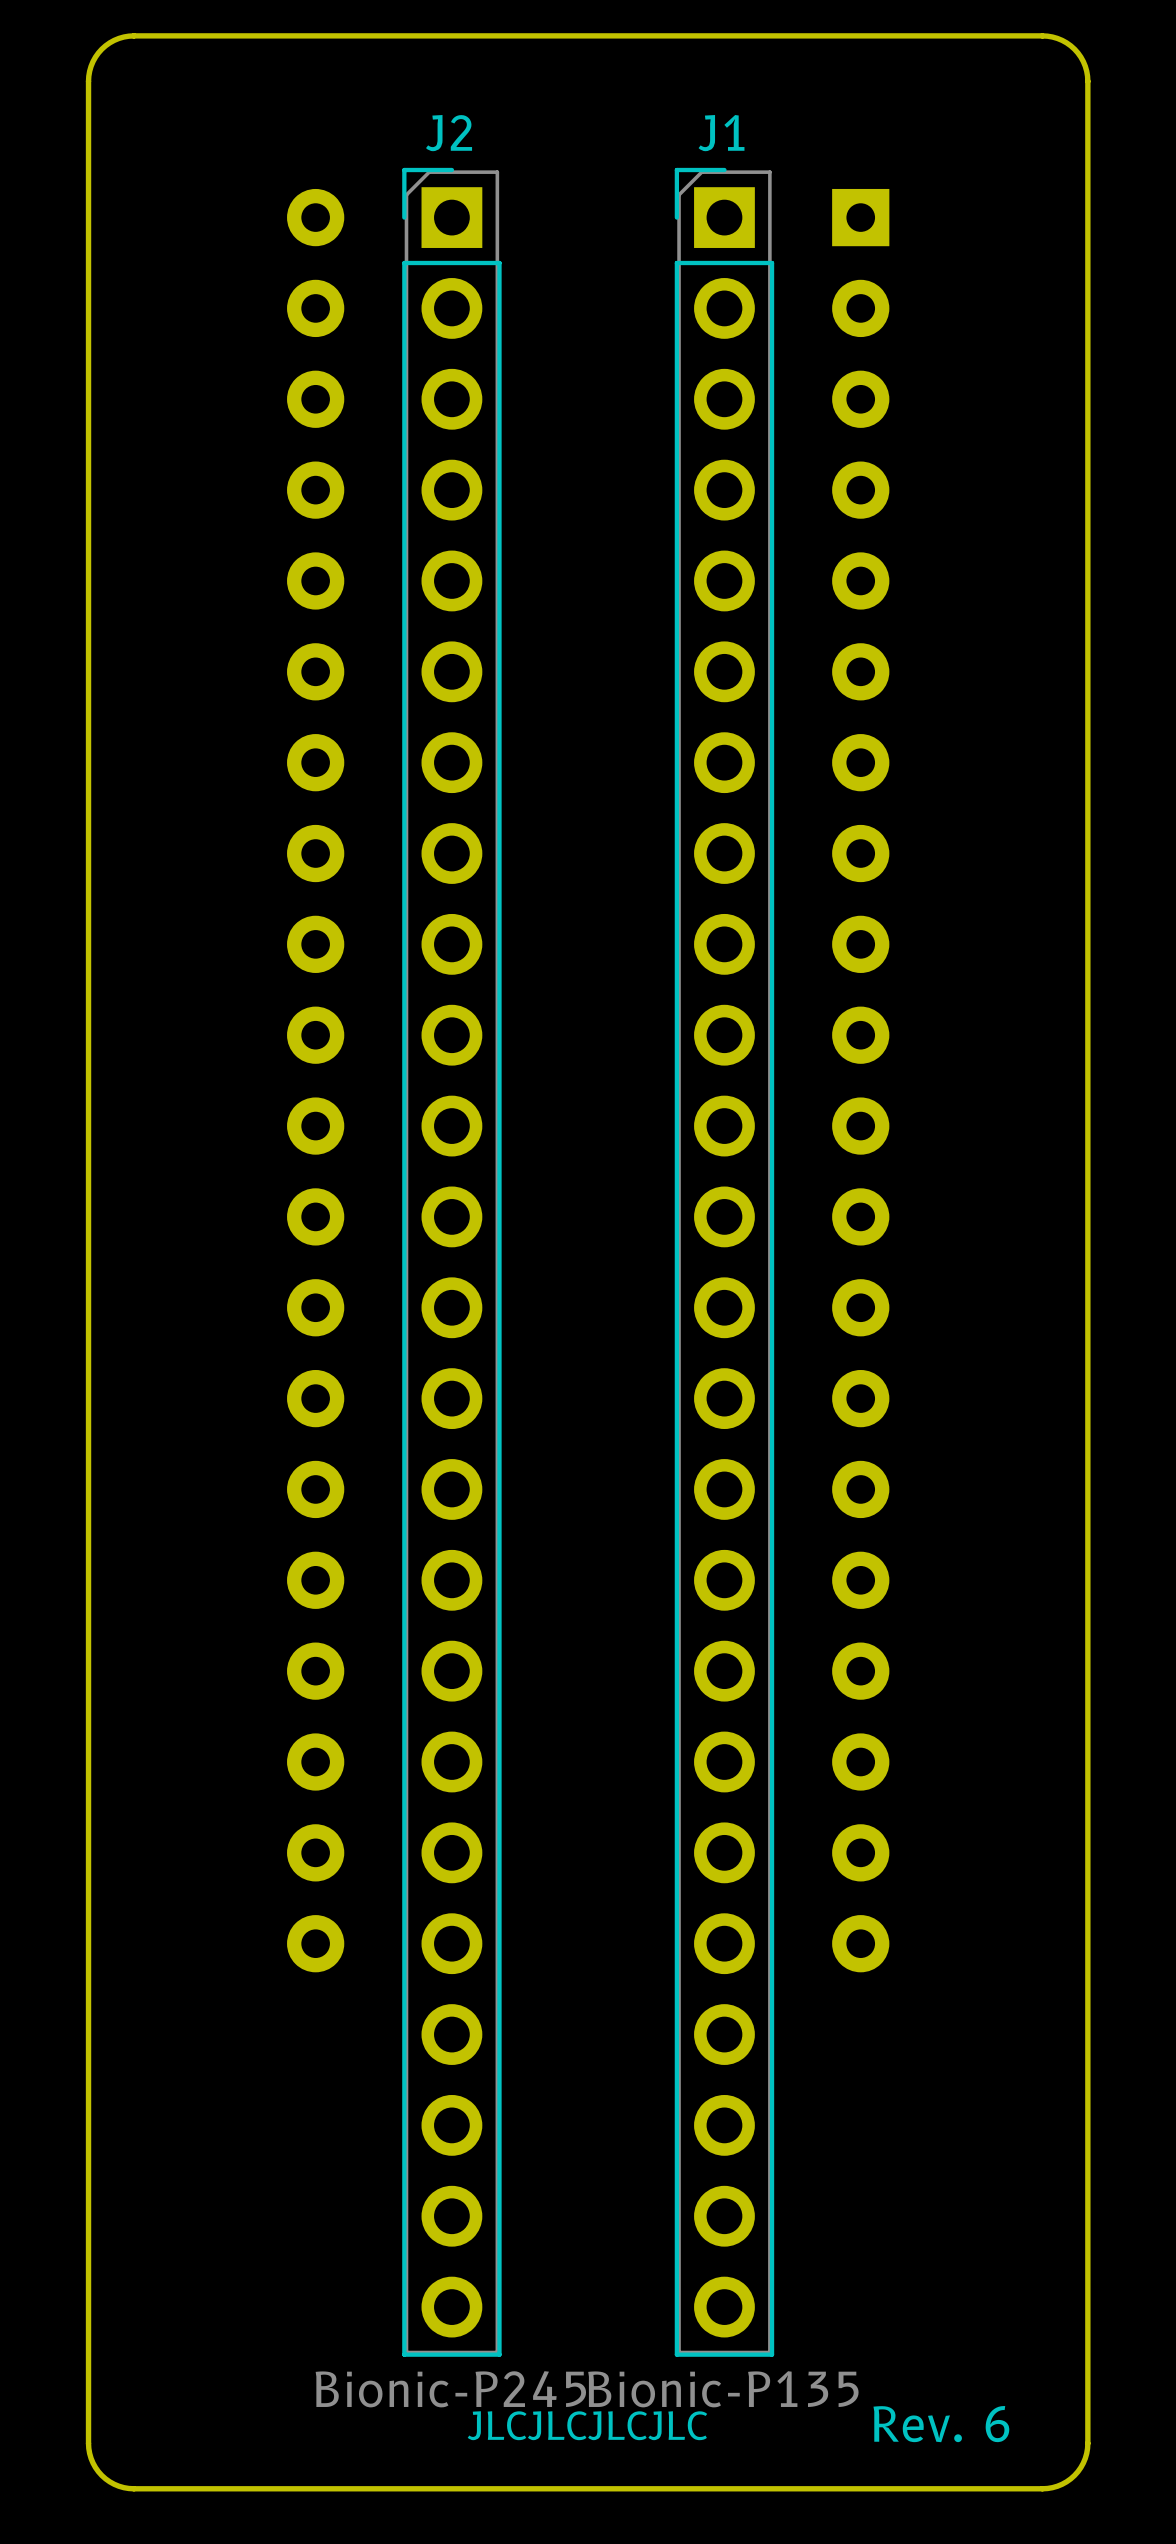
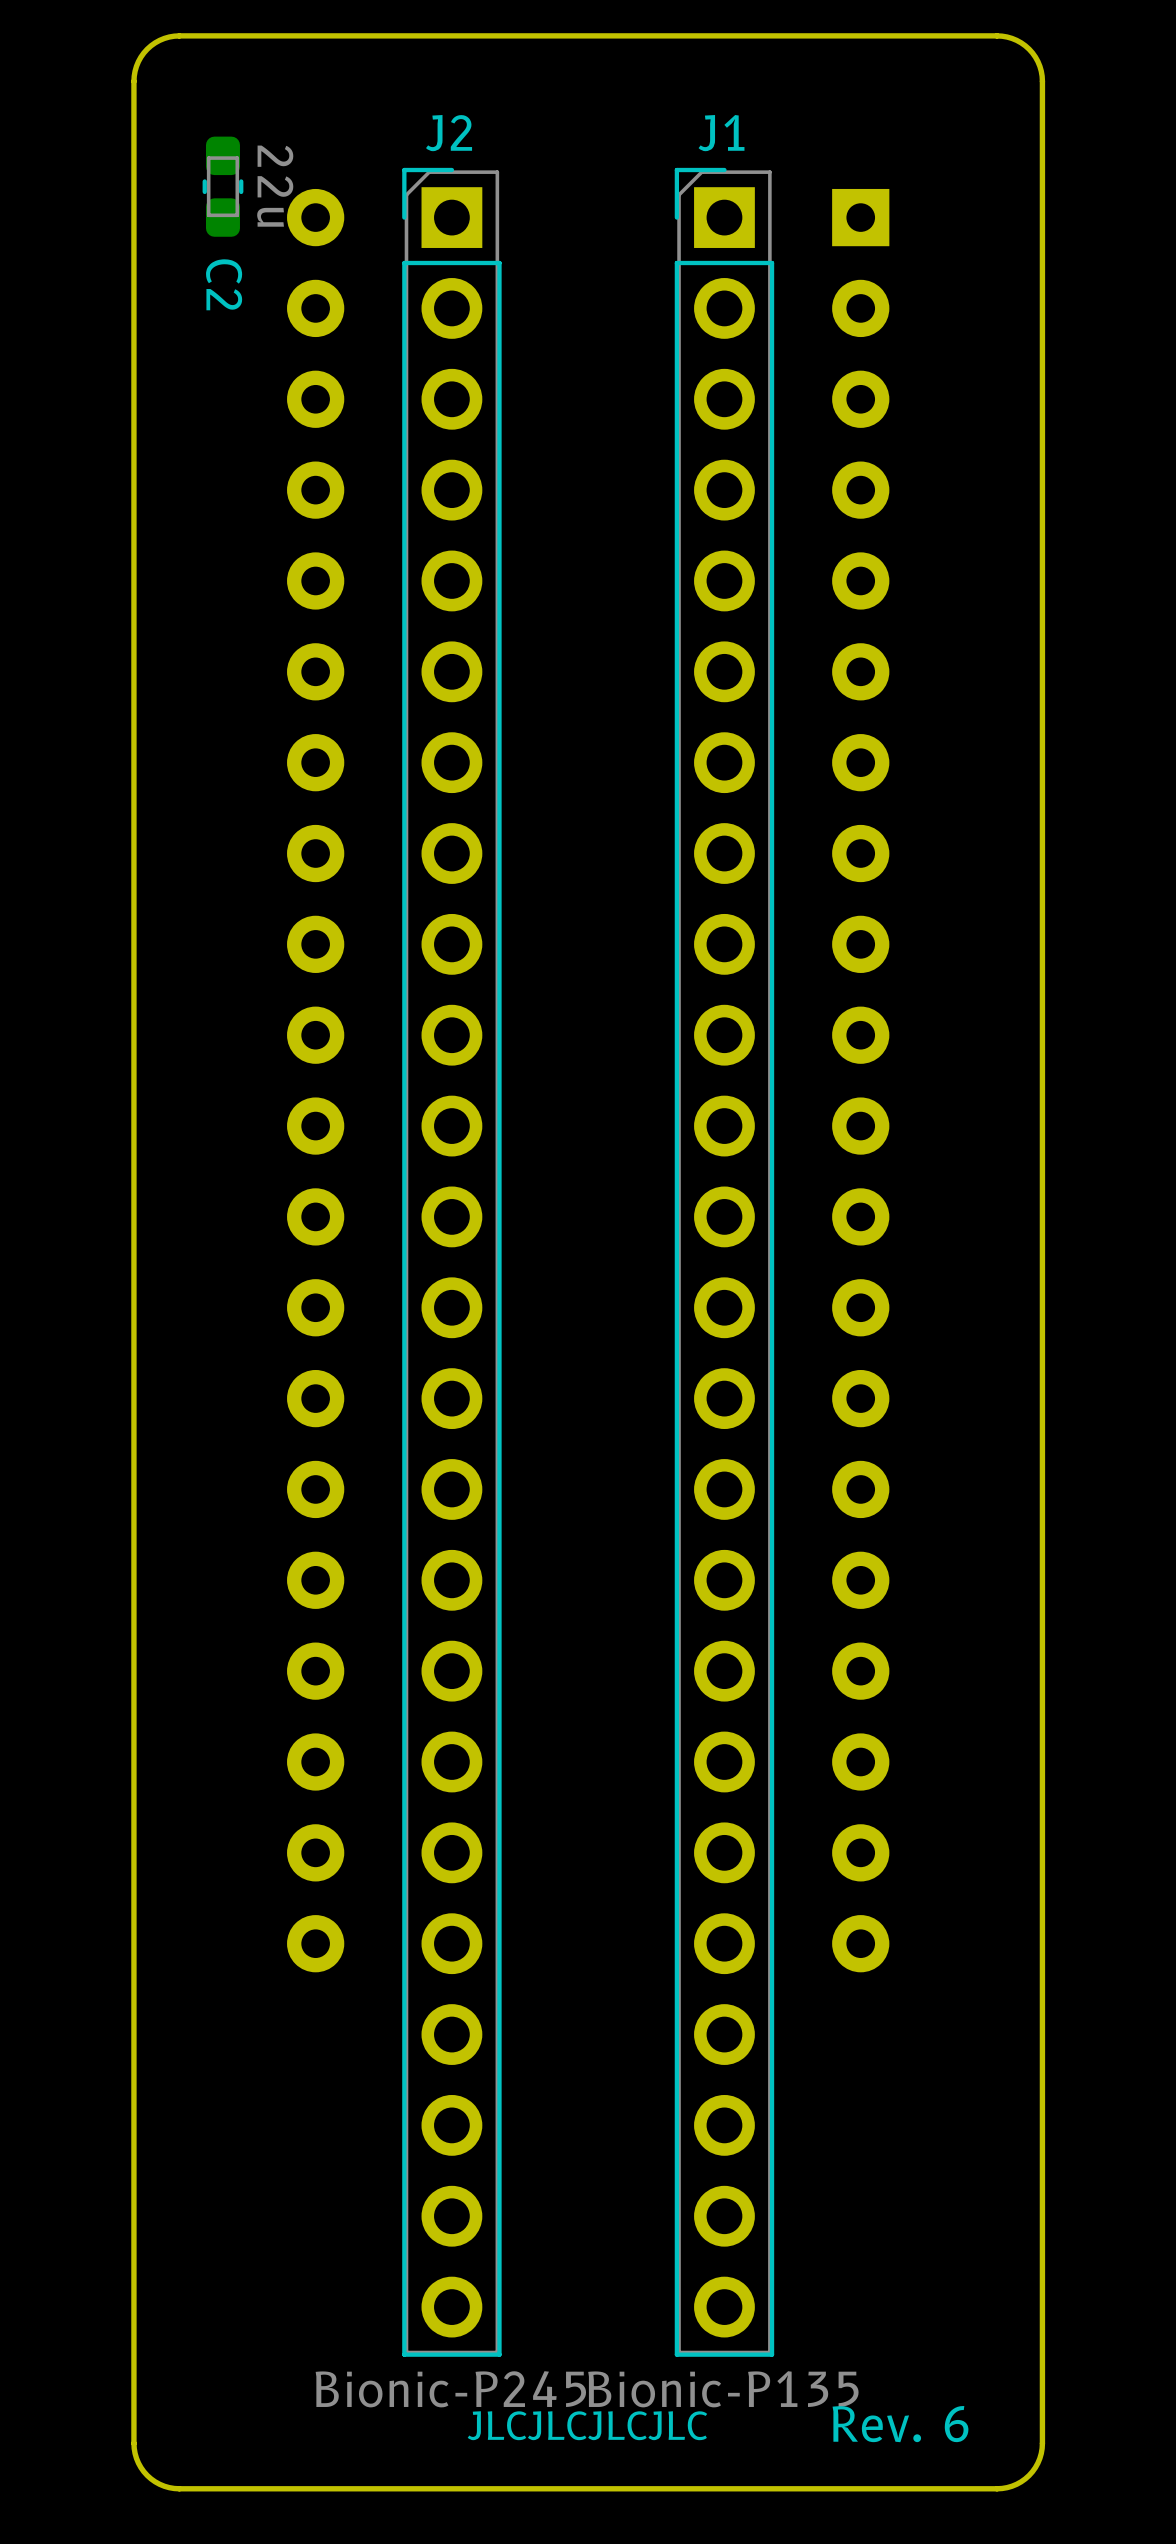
board edge: (179, 35) (128, 36) (114, 40) (105, 45) (95, 57) (89, 71) (88, 81) (88, 2443) (89, 2453) (95, 2467) (105, 2478) (114, 2484) (128, 2488) (179, 2488) -> (179, 35) (164, 38) (147, 49) (136, 66) (133, 81) (133, 2443) (136, 2458) (147, 2475) (164, 2486) (179, 2488)
board edge: (997, 35) (1047, 36) (1062, 40) (1070, 45) (1080, 57) (1086, 71) (1087, 81) (1087, 2443) (1086, 2453) (1080, 2467) (1074, 2475) (1062, 2484) (1047, 2488) (997, 2488) -> (997, 35) (1012, 38) (1029, 49) (1039, 66) (1042, 81) (1042, 2443) (1039, 2458) (1029, 2475) (1012, 2486) (997, 2488)
C2: none -> 22u (222, 186)
text position: Rev. 6 (941, 2424) -> Rev. 6 (900, 2424)

